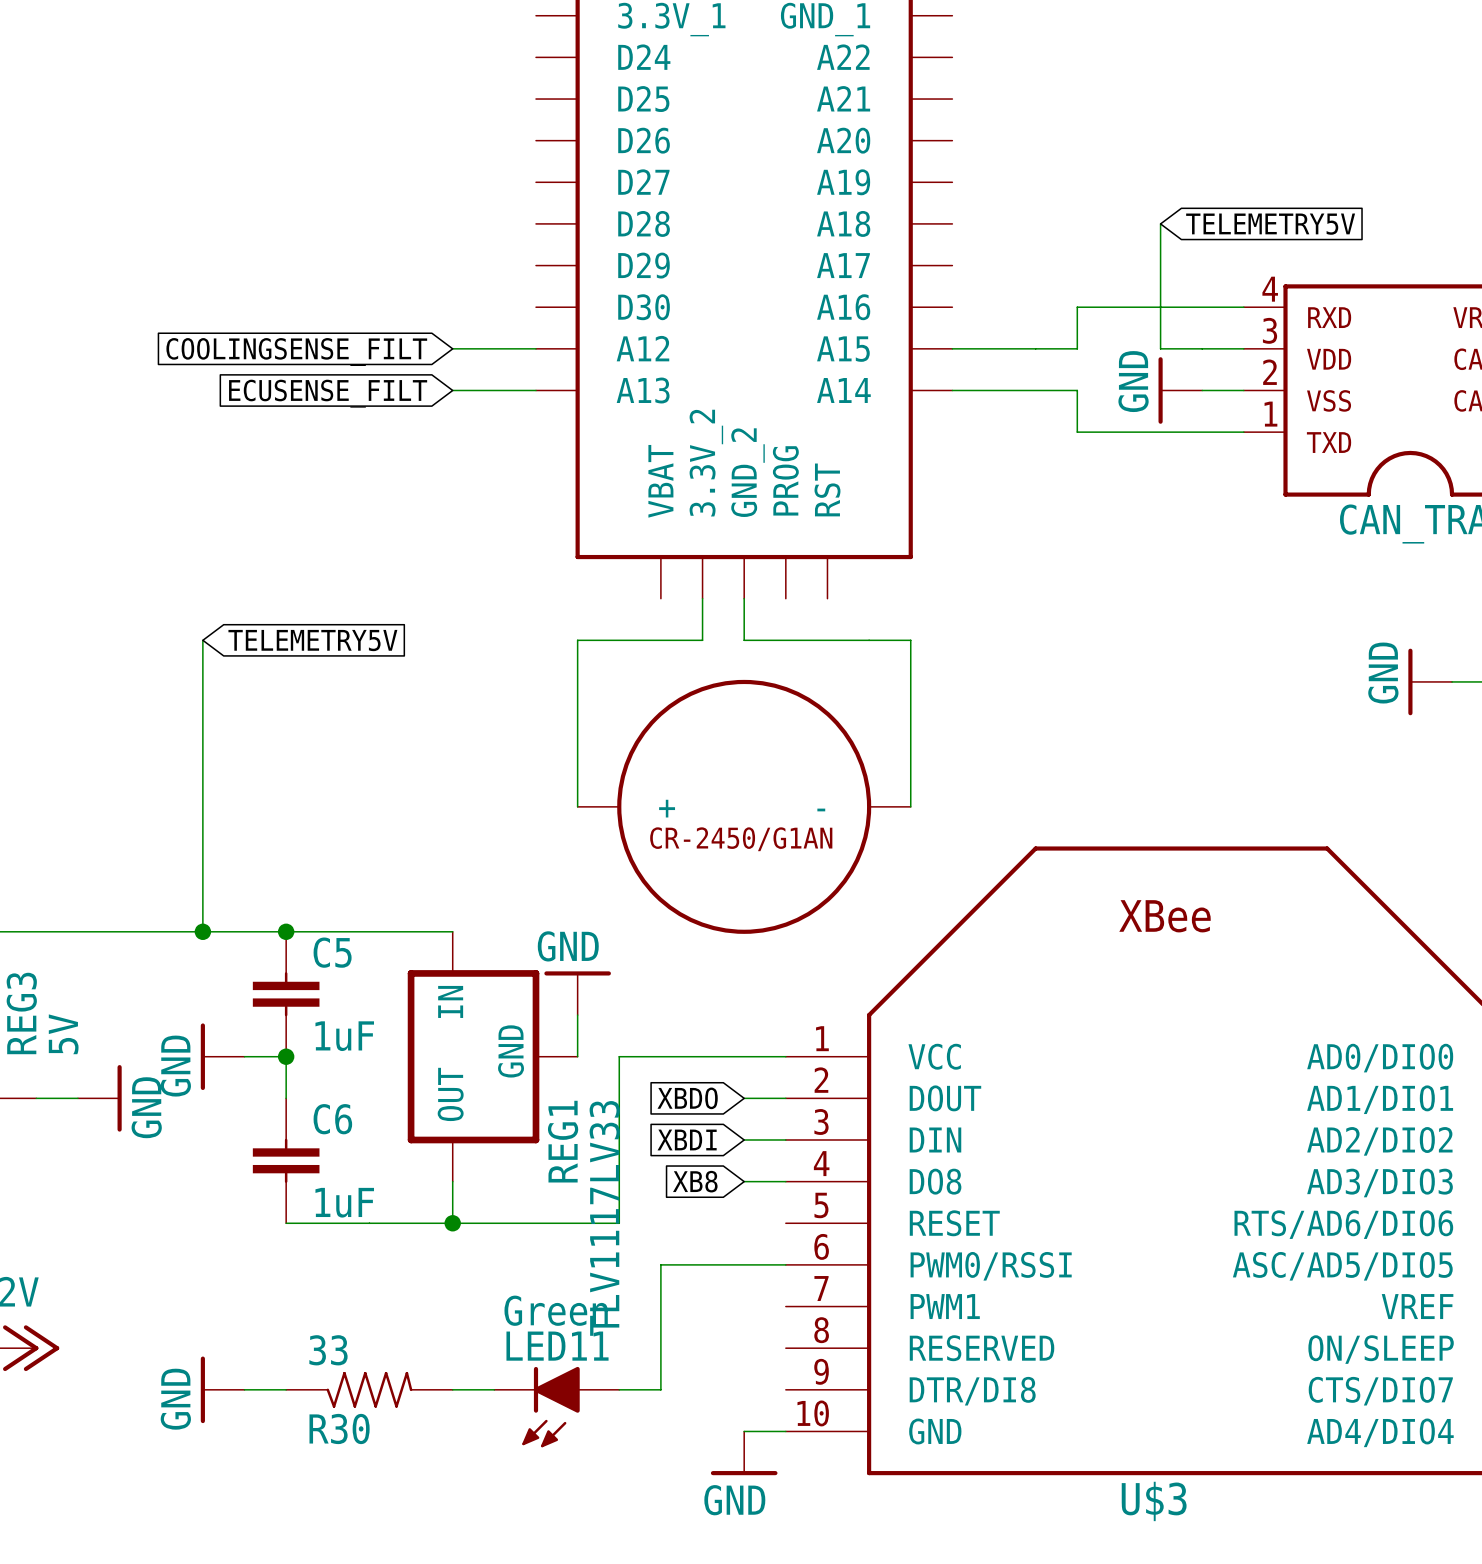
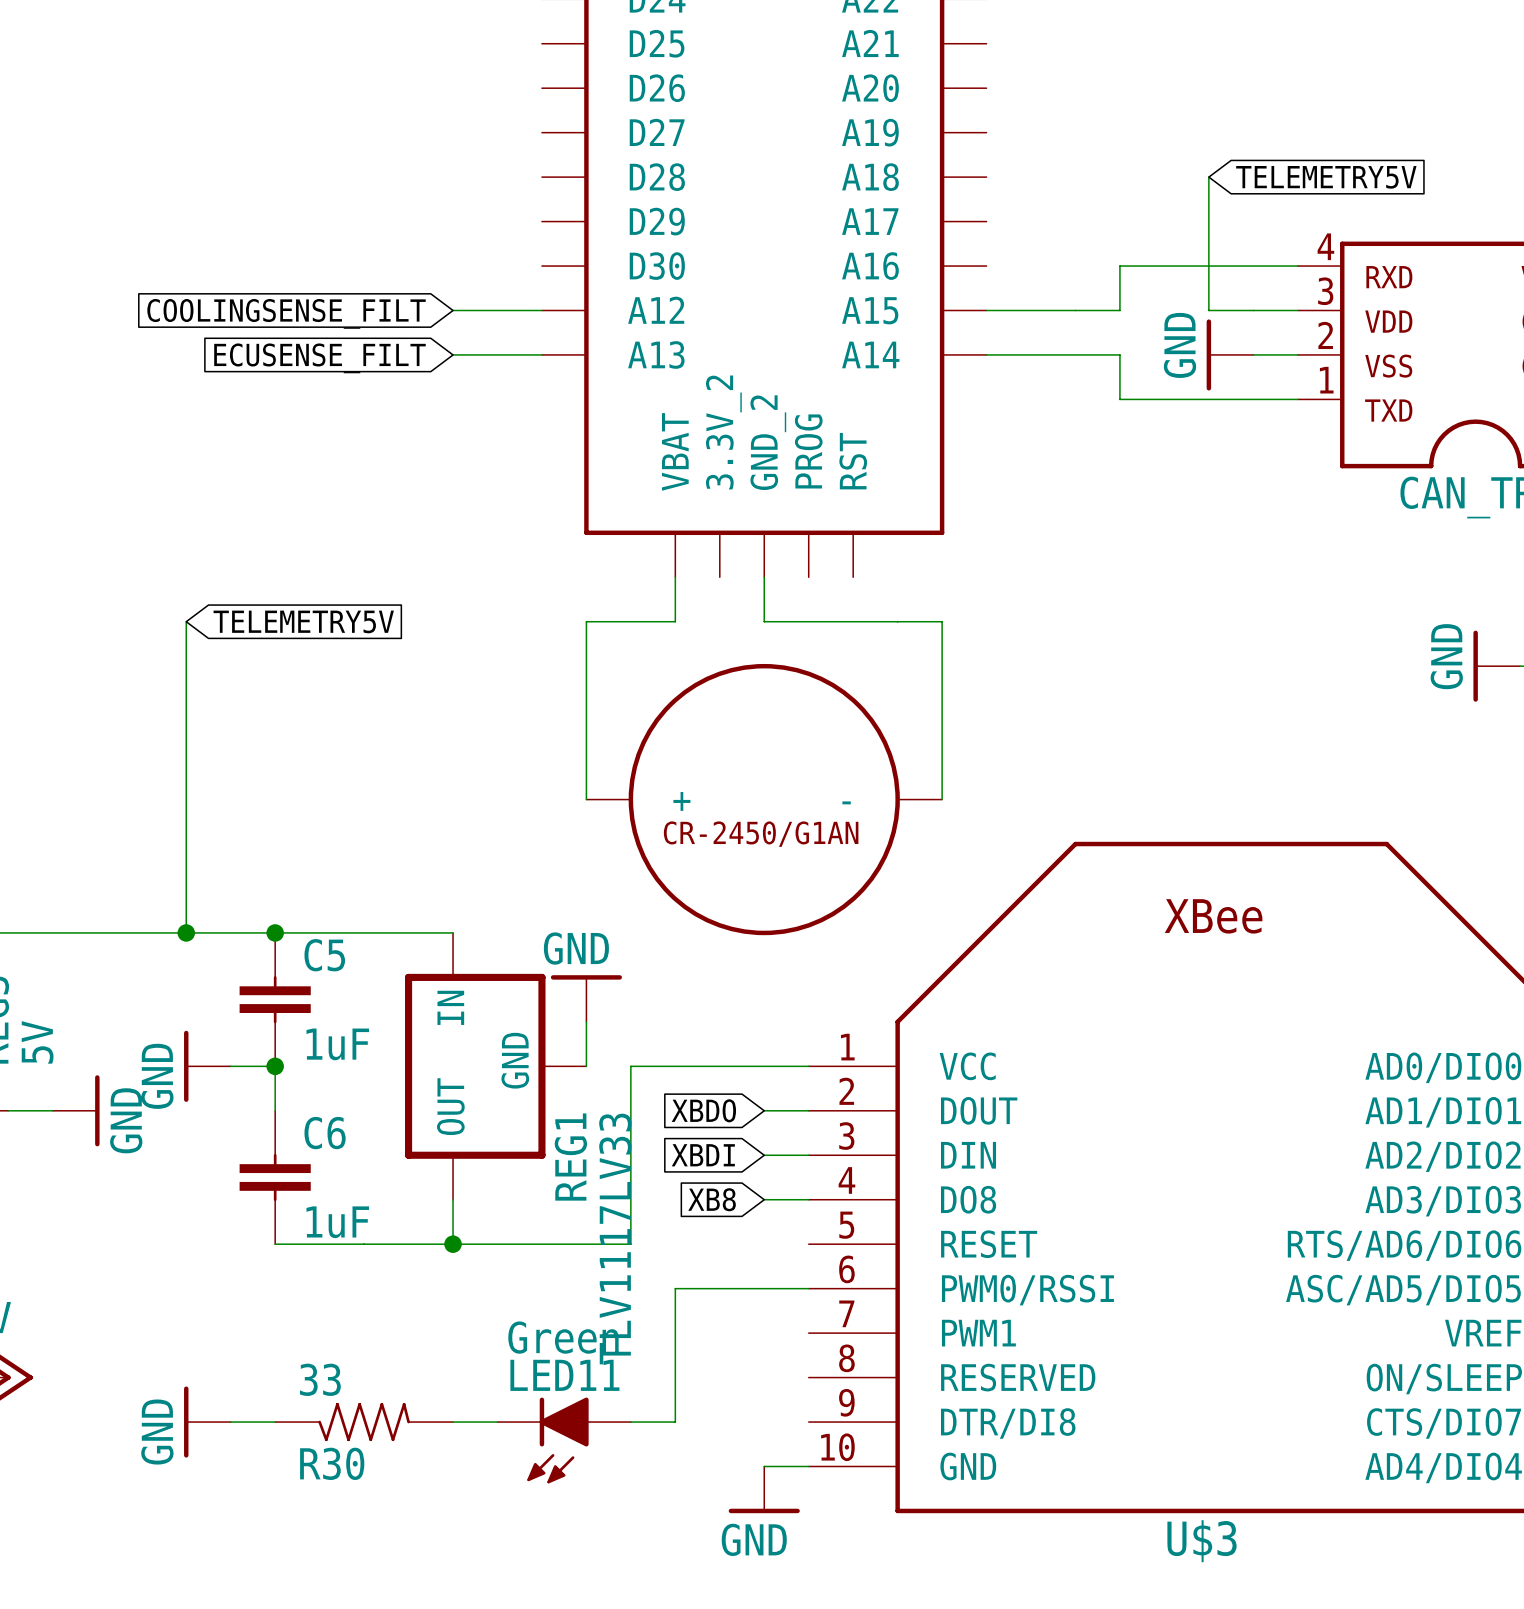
wire: (702, 598) (702, 640) (660, 640) -> (675, 577) (675, 621)

